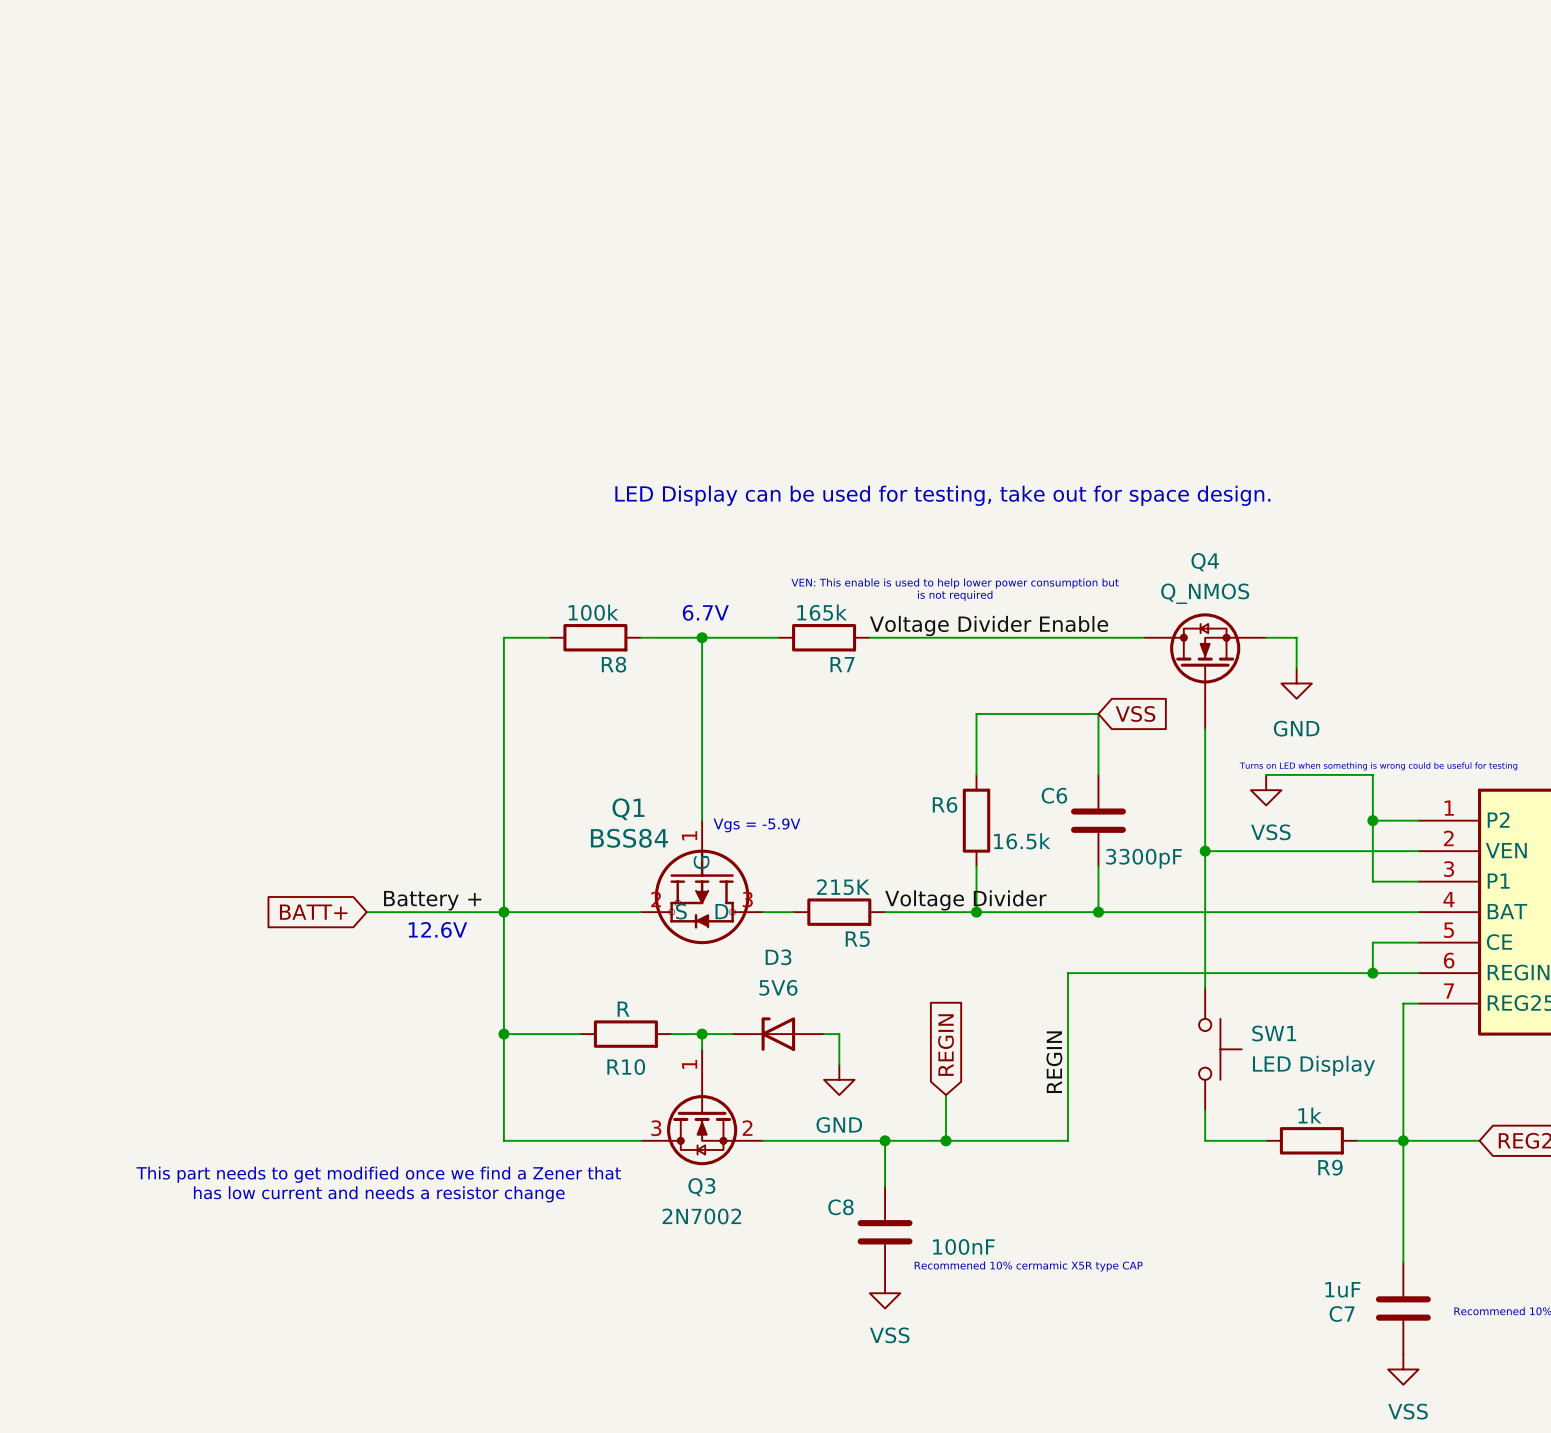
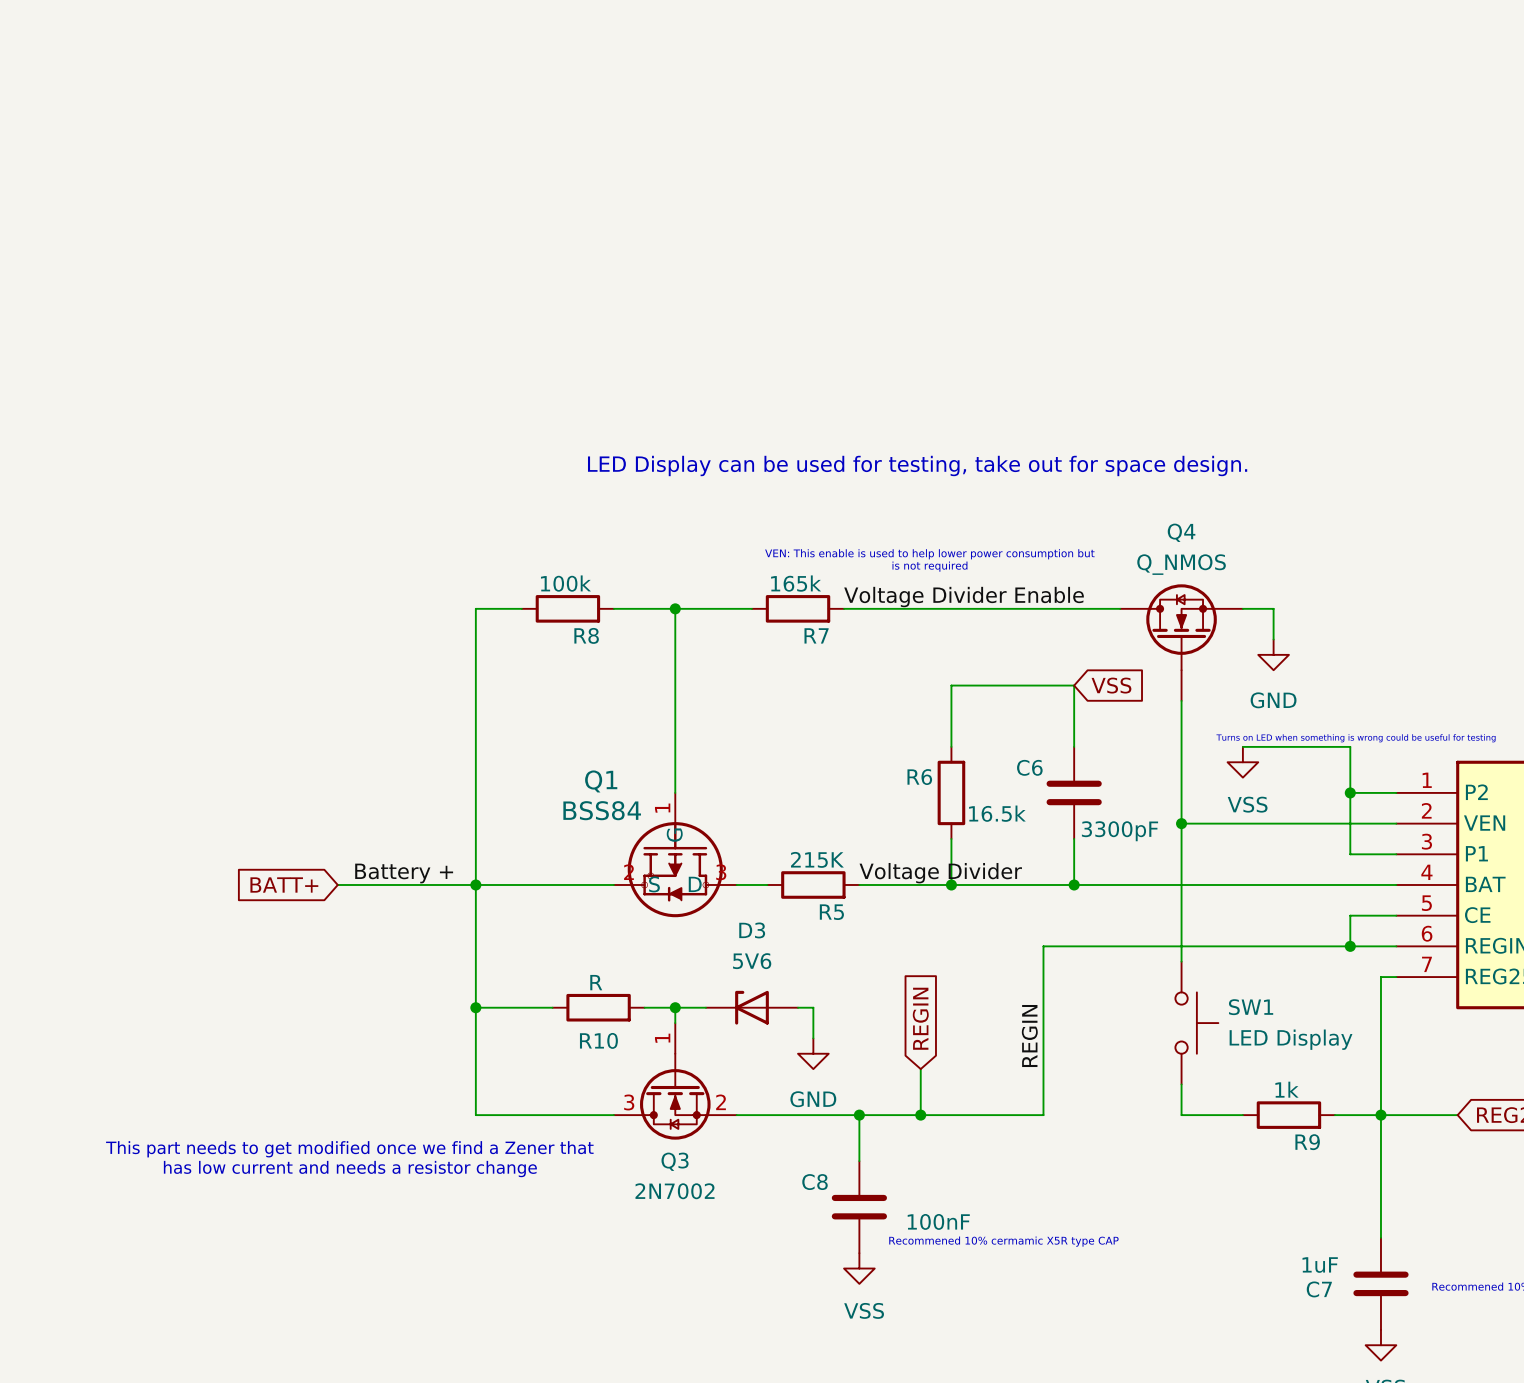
text: 6.7V (705, 612) -> none
text: Vgs = -5.9V (756, 825) -> none
text: 12.6V (437, 929) -> none

